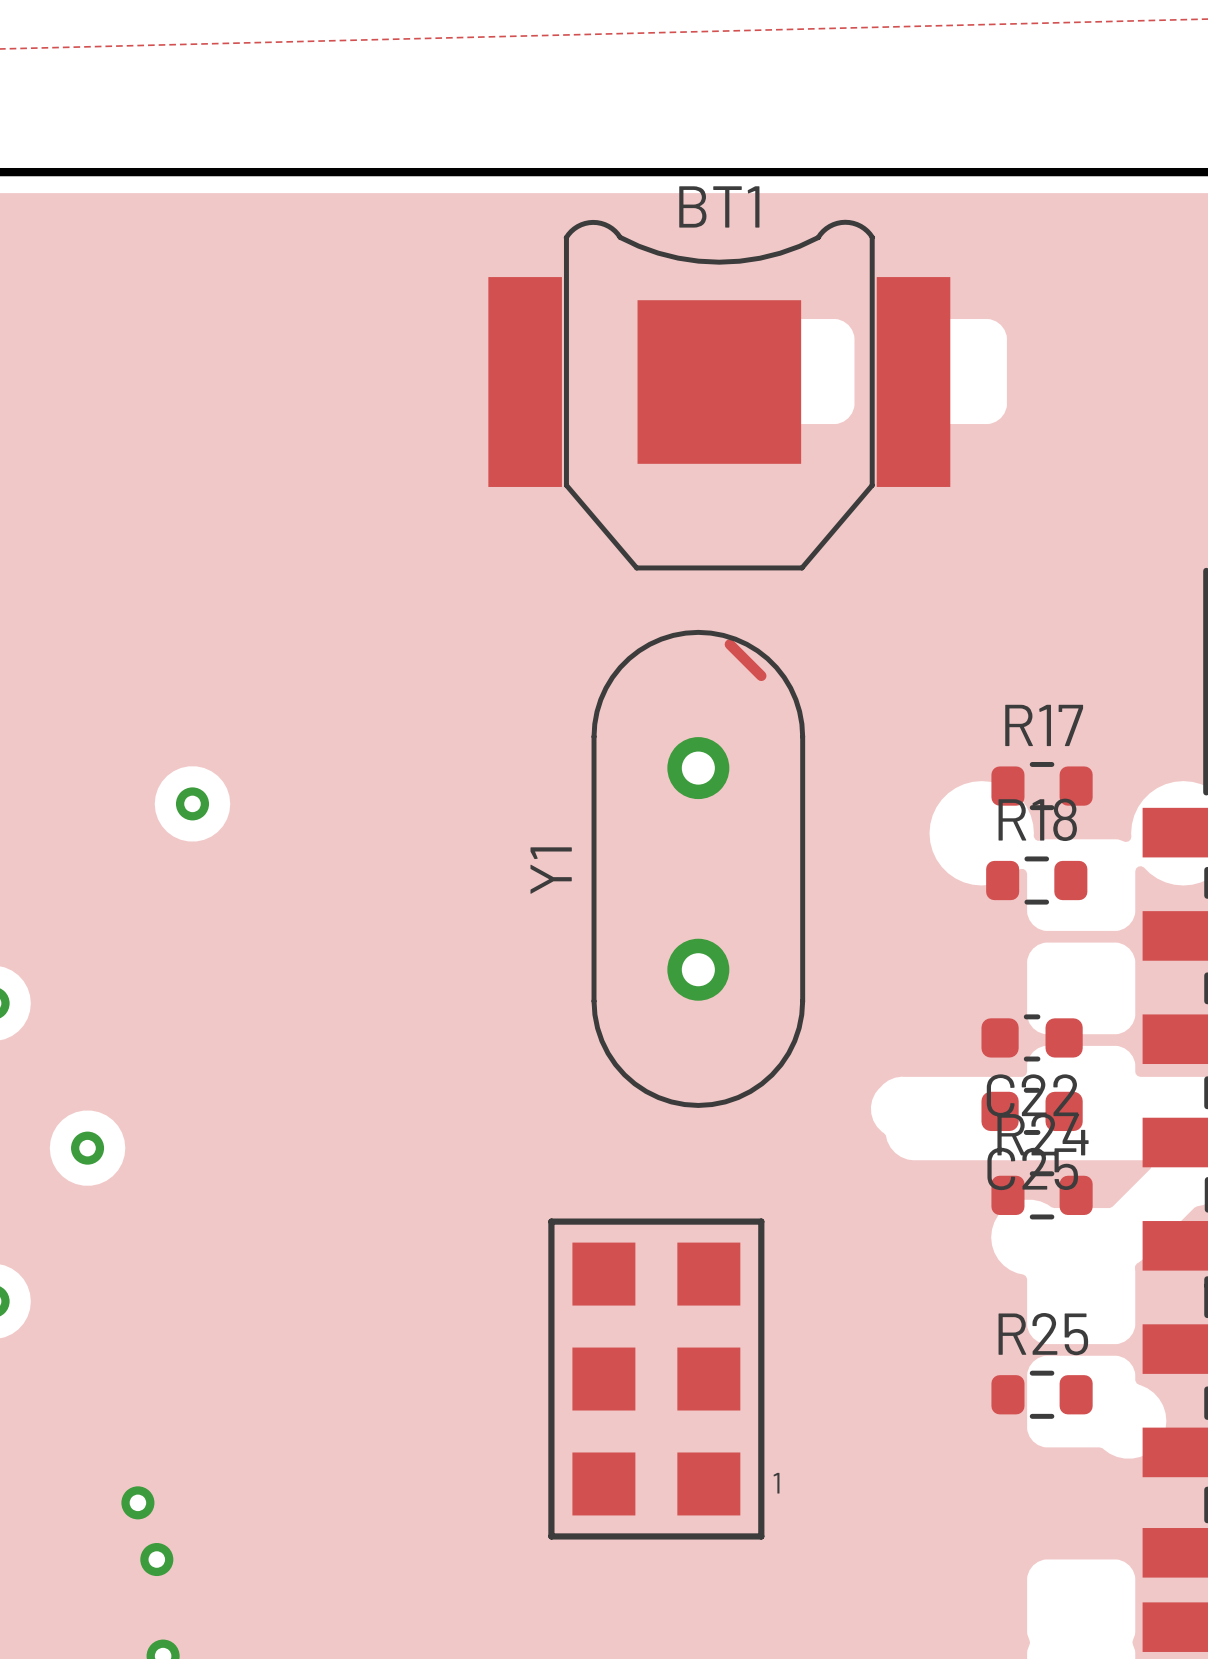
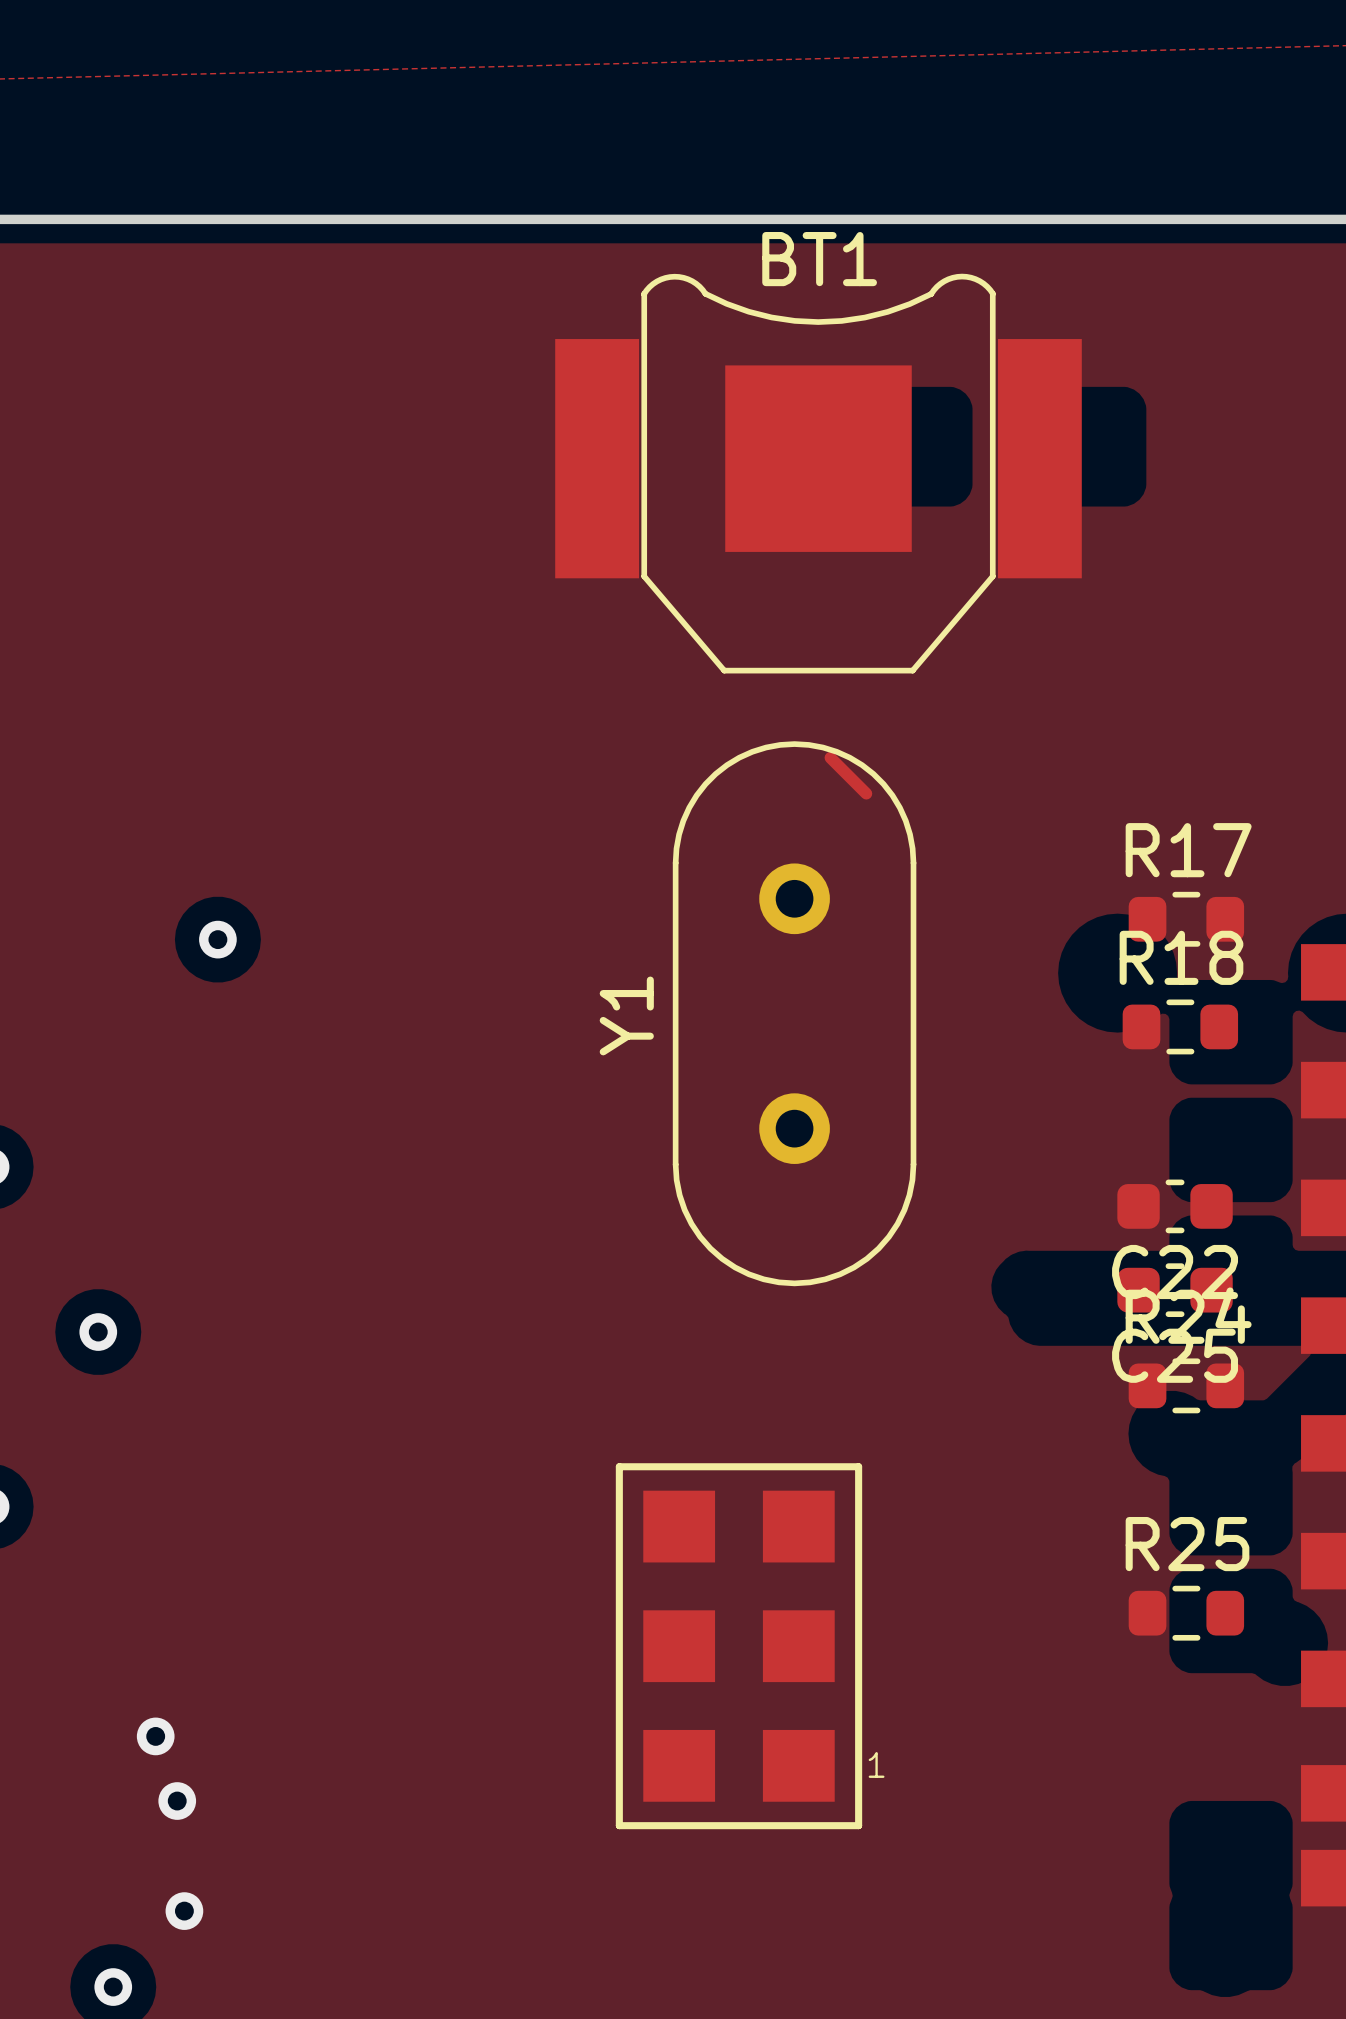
part position: (656, 1379) -> (738, 1646)

